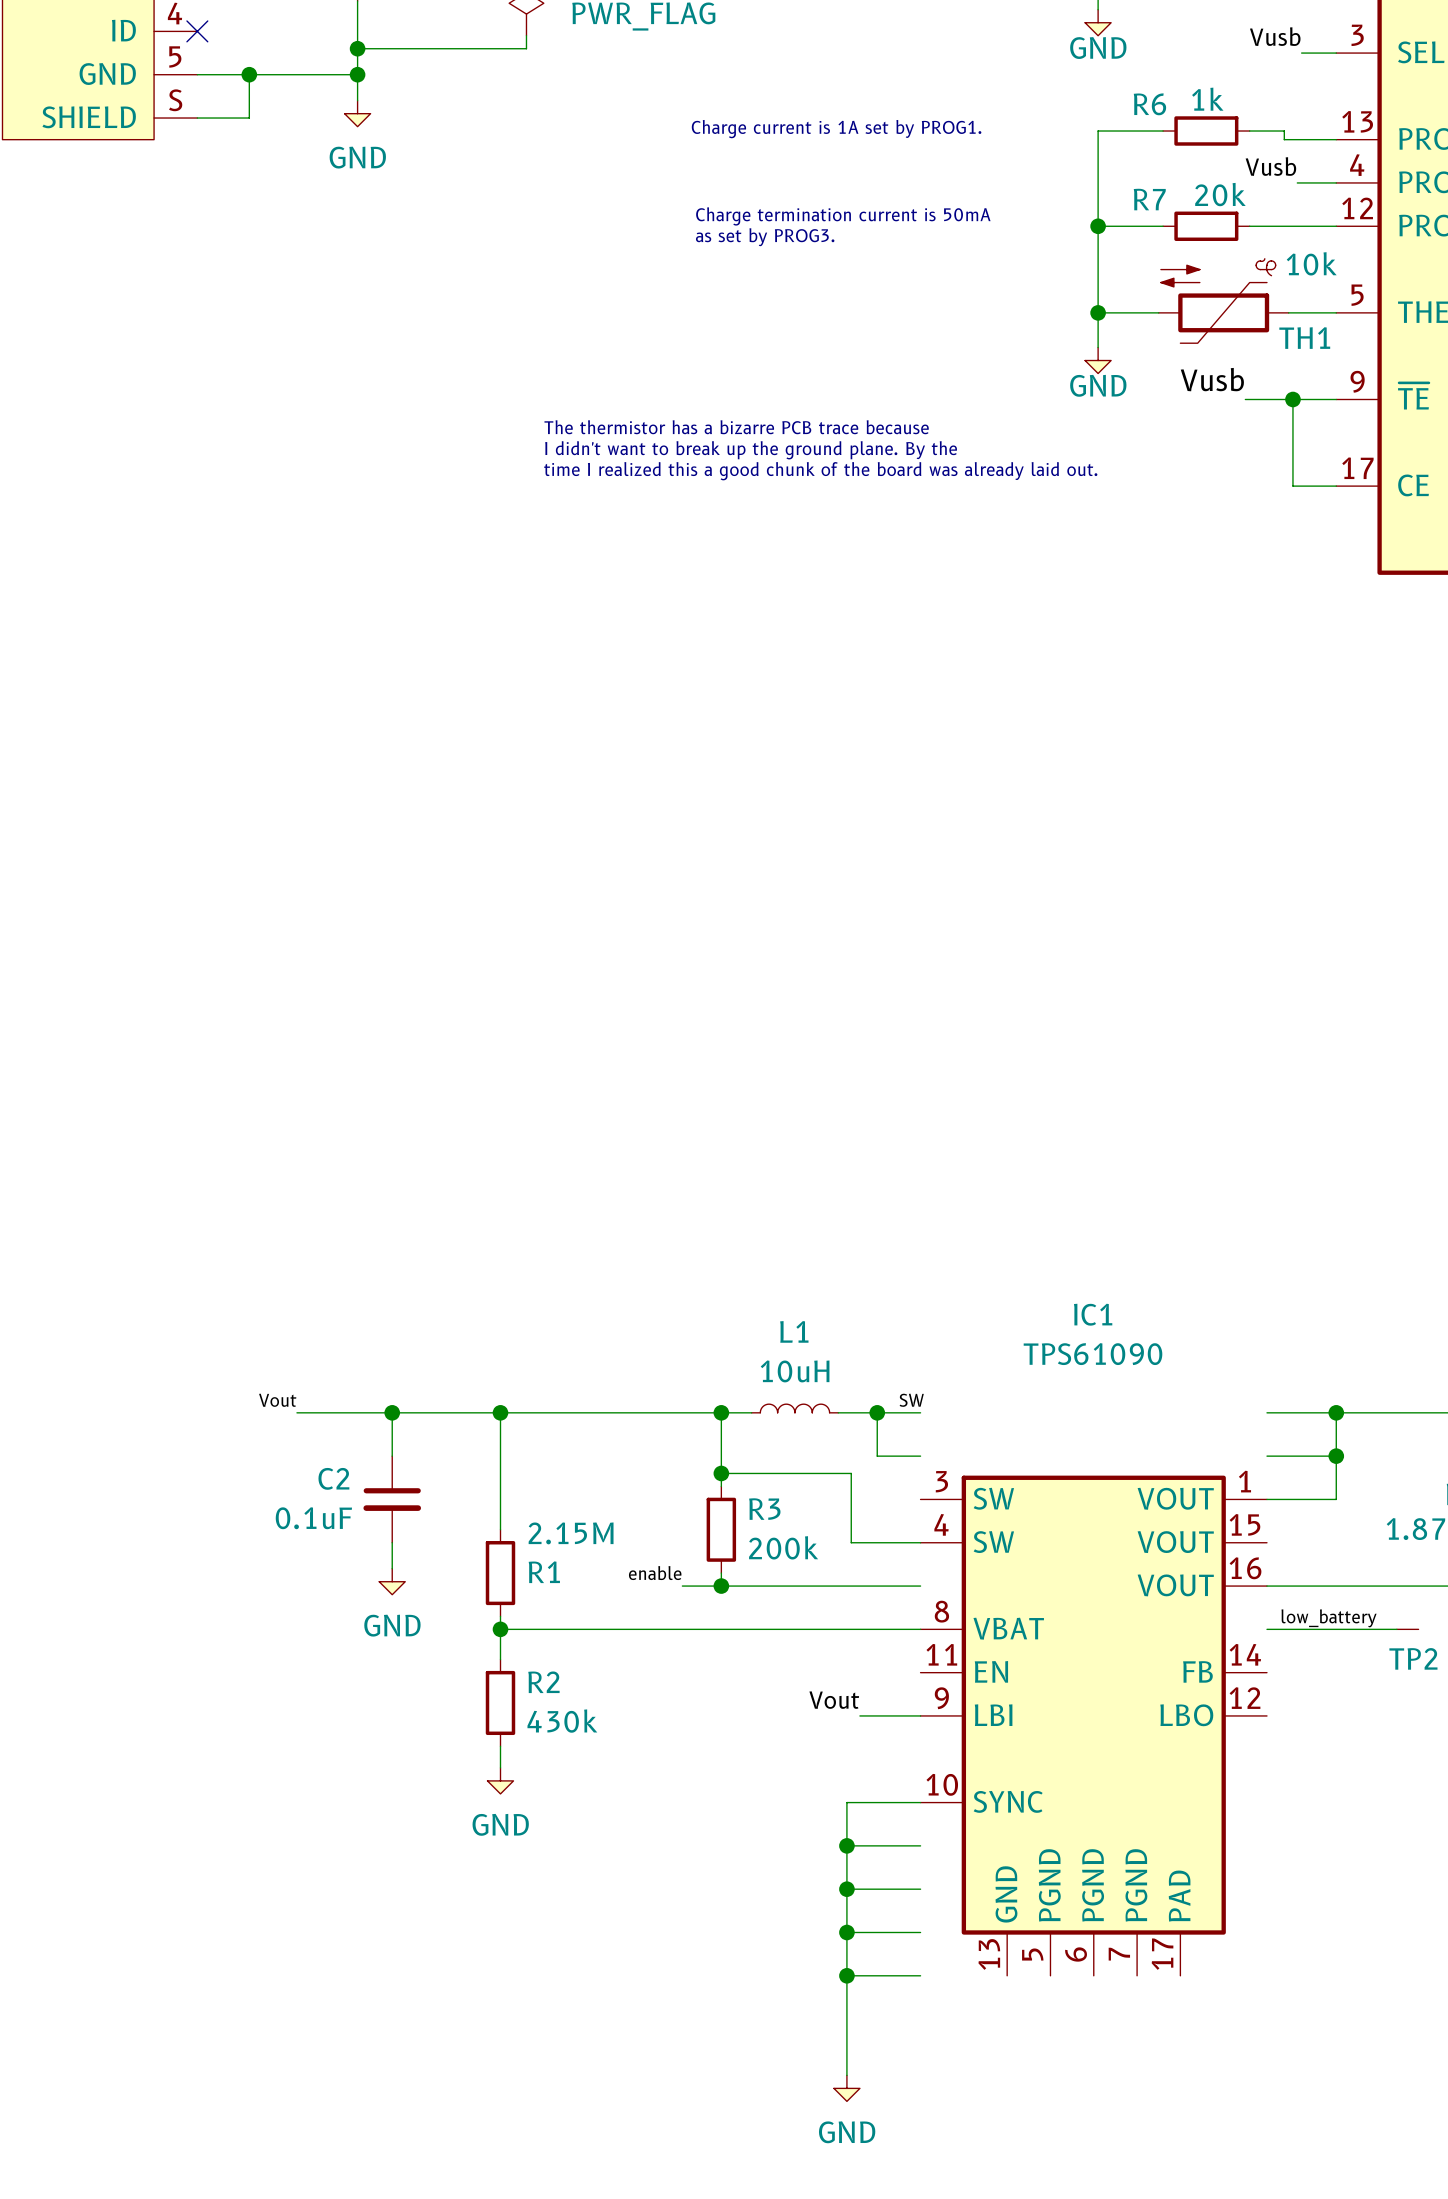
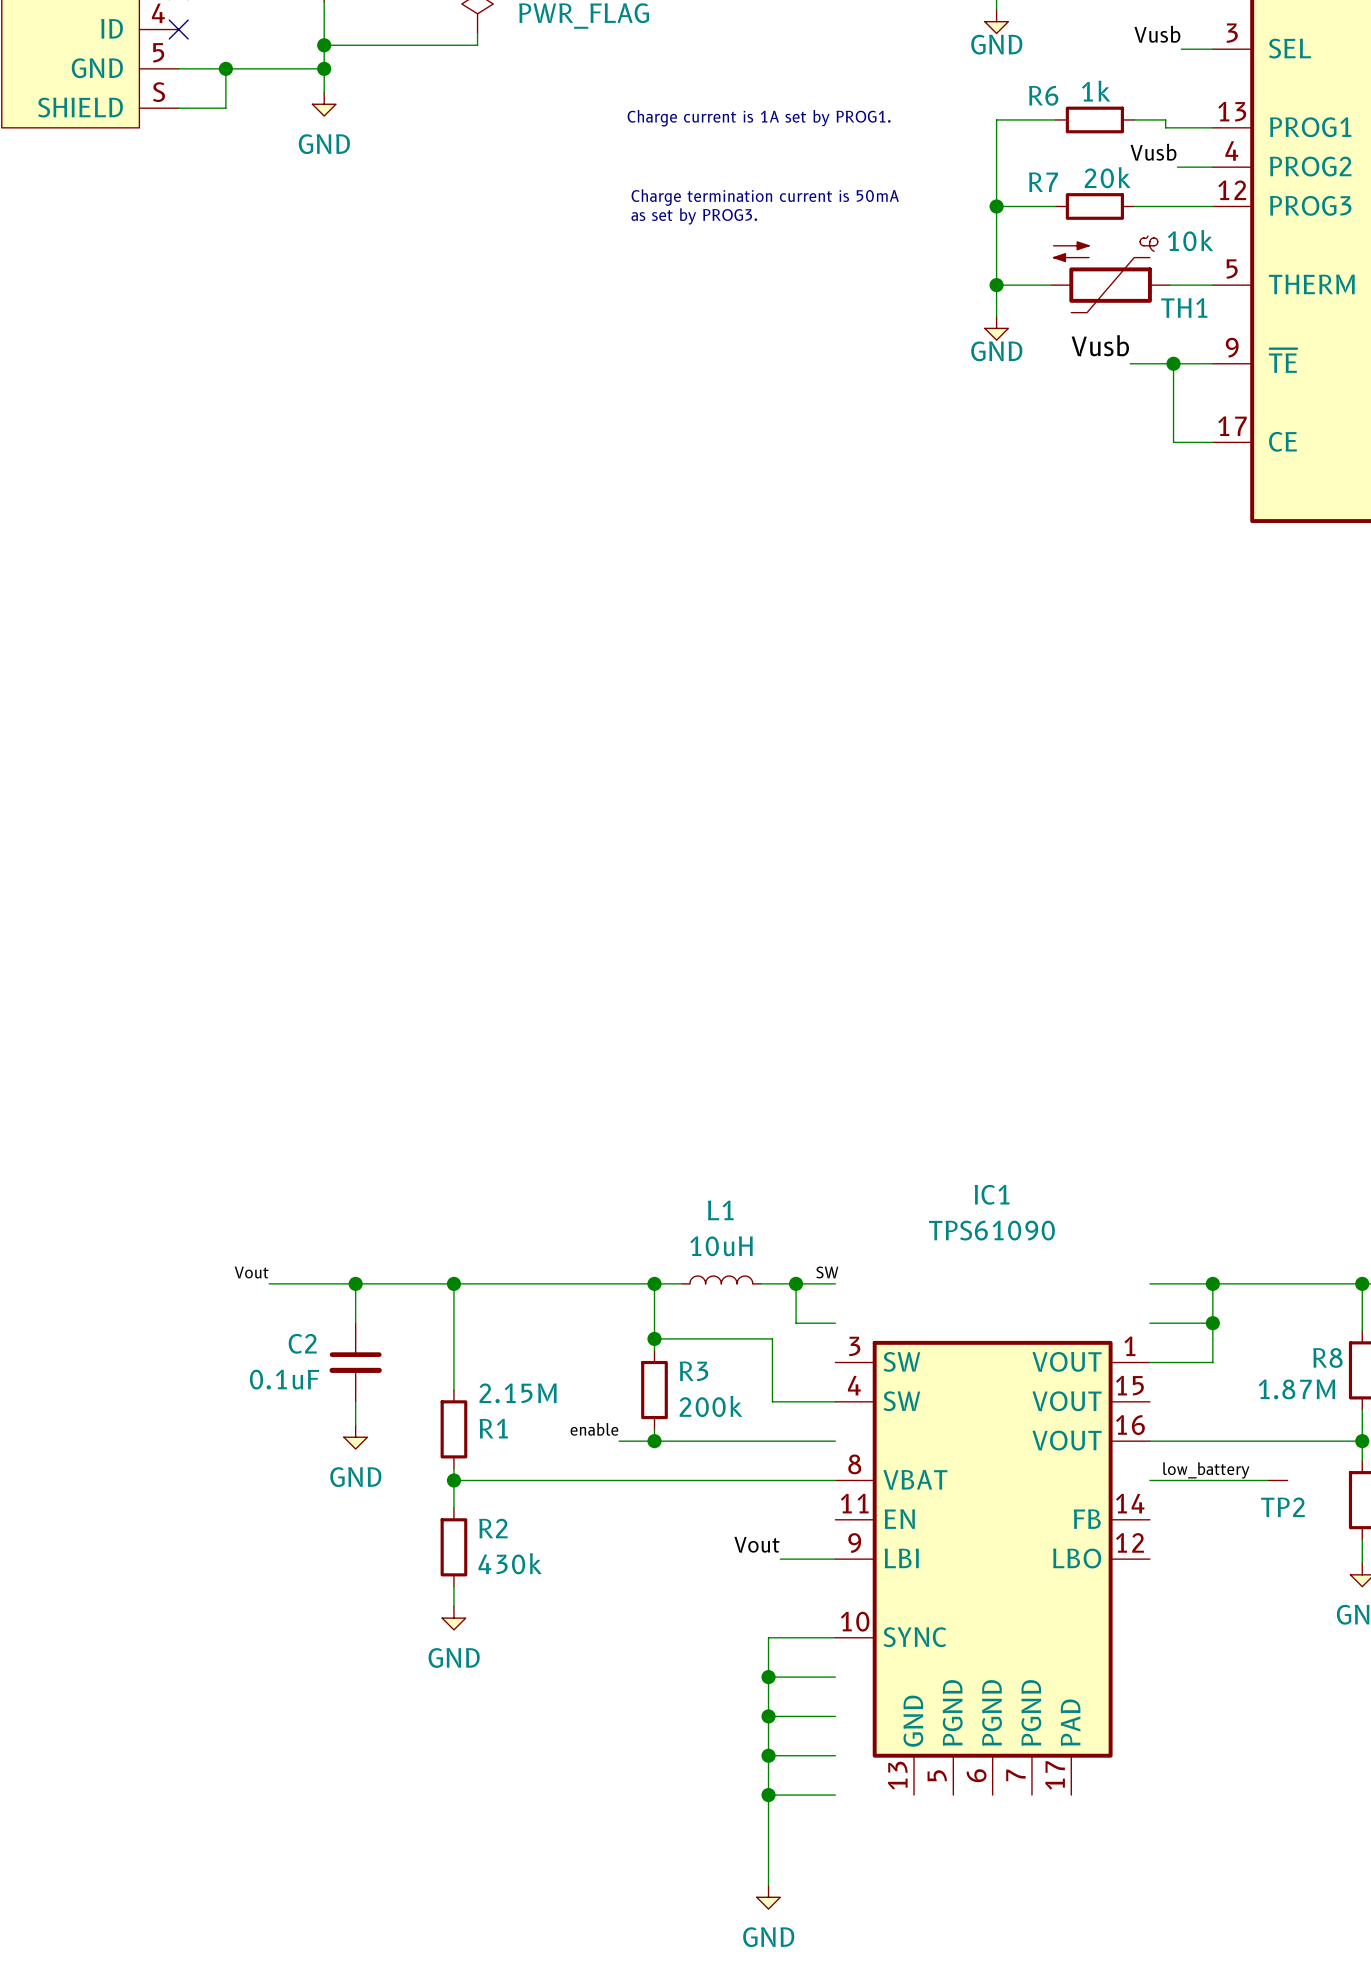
text: The thermistor has a bizarre PCB trace because (736, 427) -> none
text: I didn't want to break up the ground plane. By the (751, 450) -> none
text: time I realized this a good chunk of the board was already laid out. (820, 471) -> none

